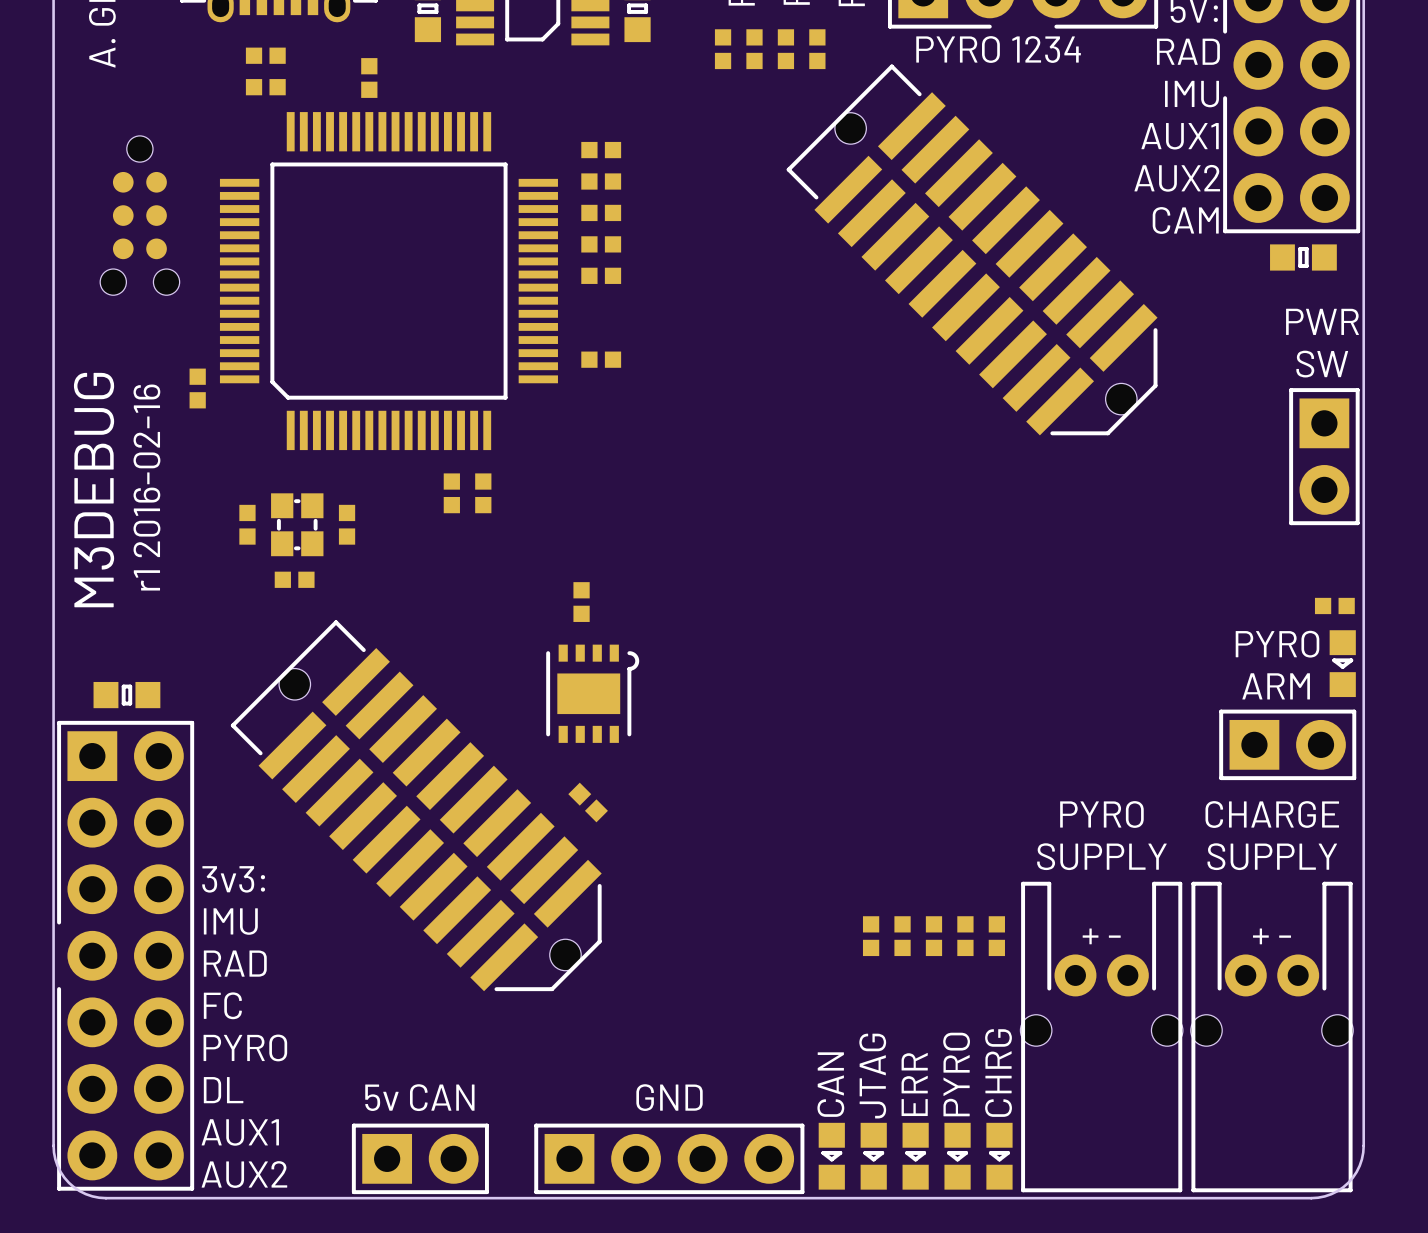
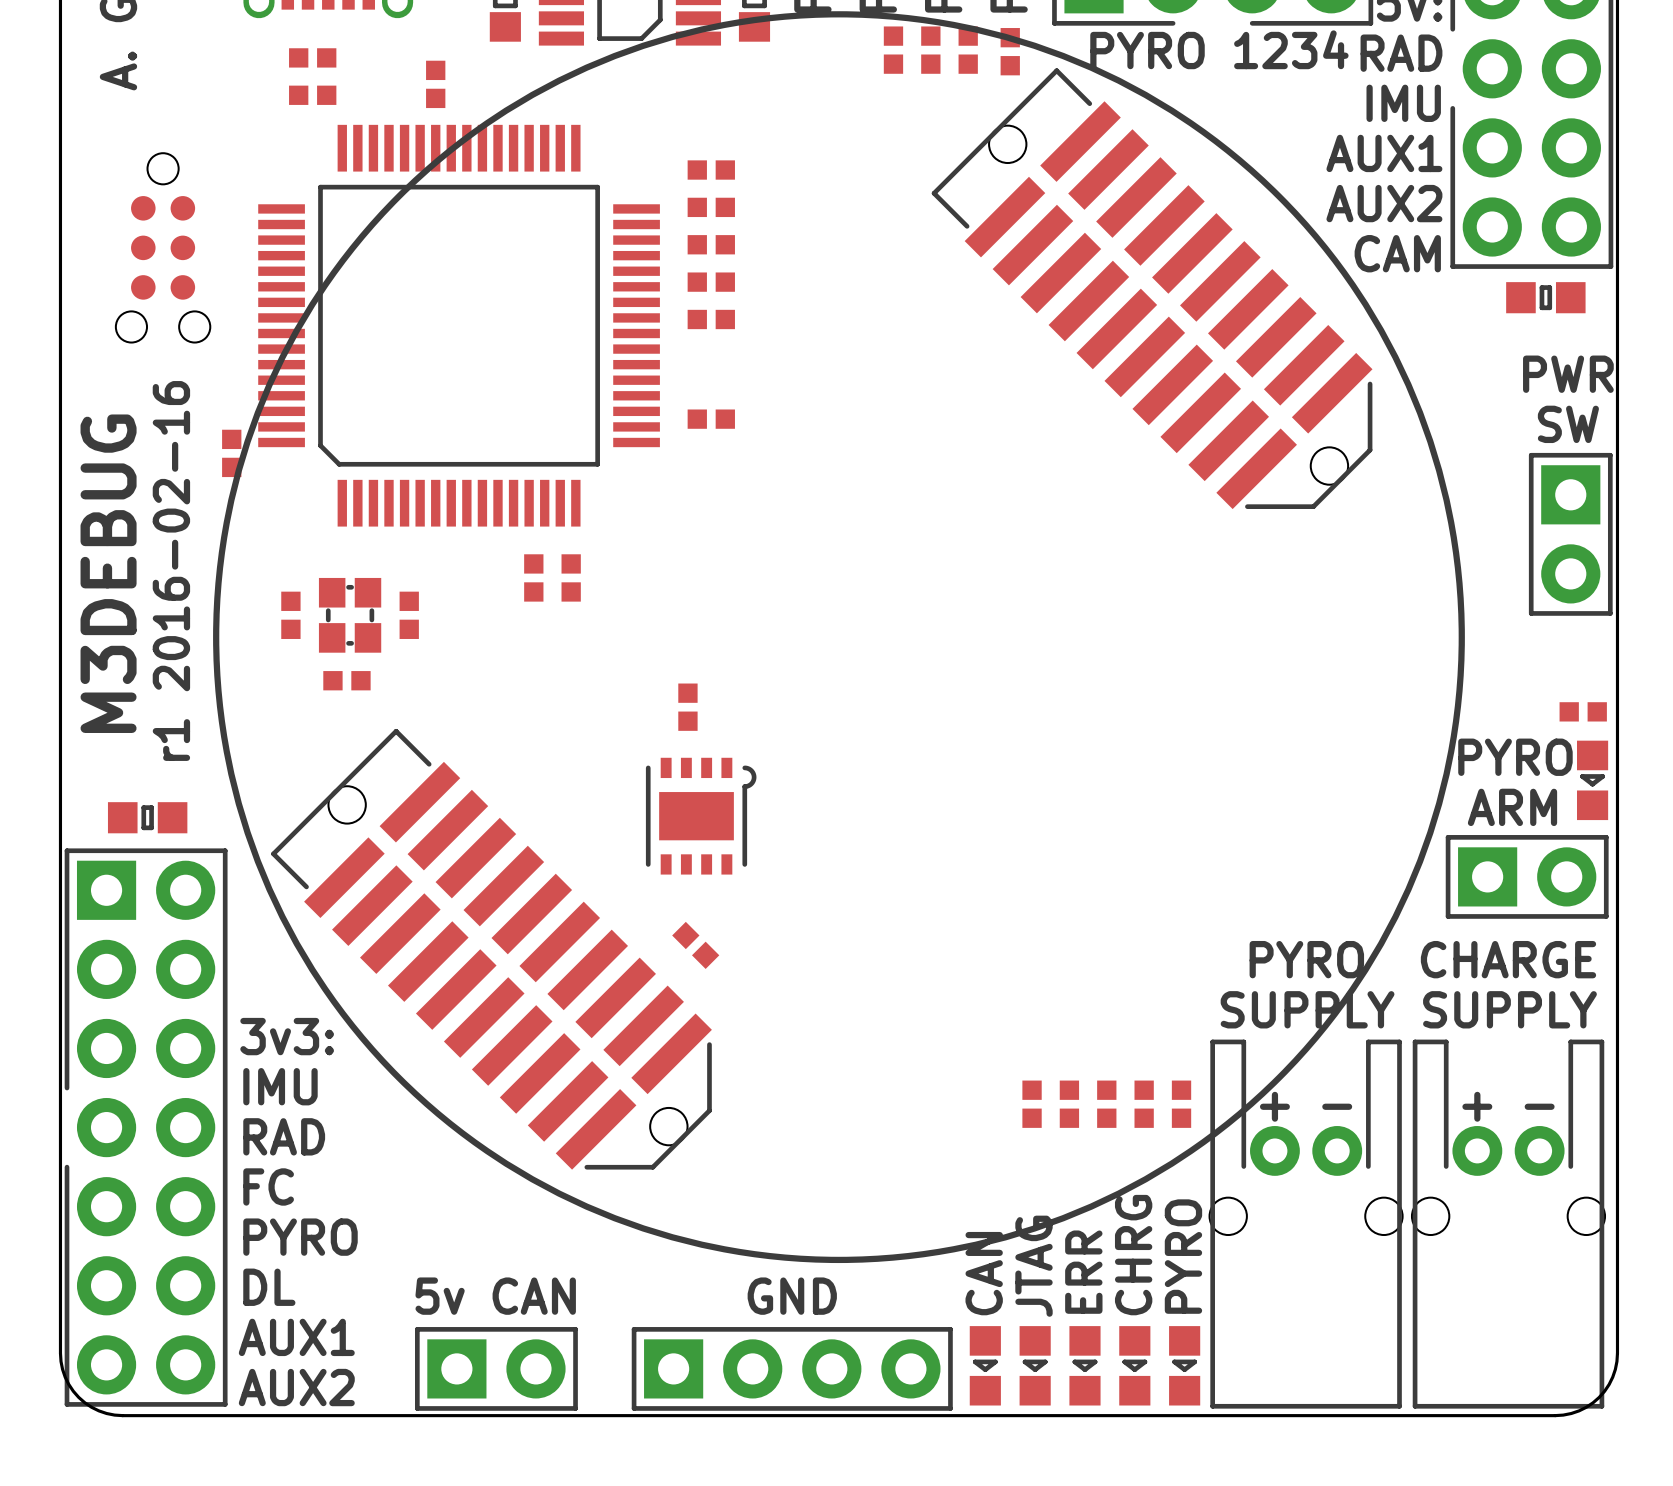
drawing: none -> [213, 11, 1465, 1264]
part position: (723, 49) -> (1010, 51)
text: CHRG (998, 1073) -> PYRO (1183, 1256)
text: PYRO (956, 1074) -> CHRG (1133, 1255)

